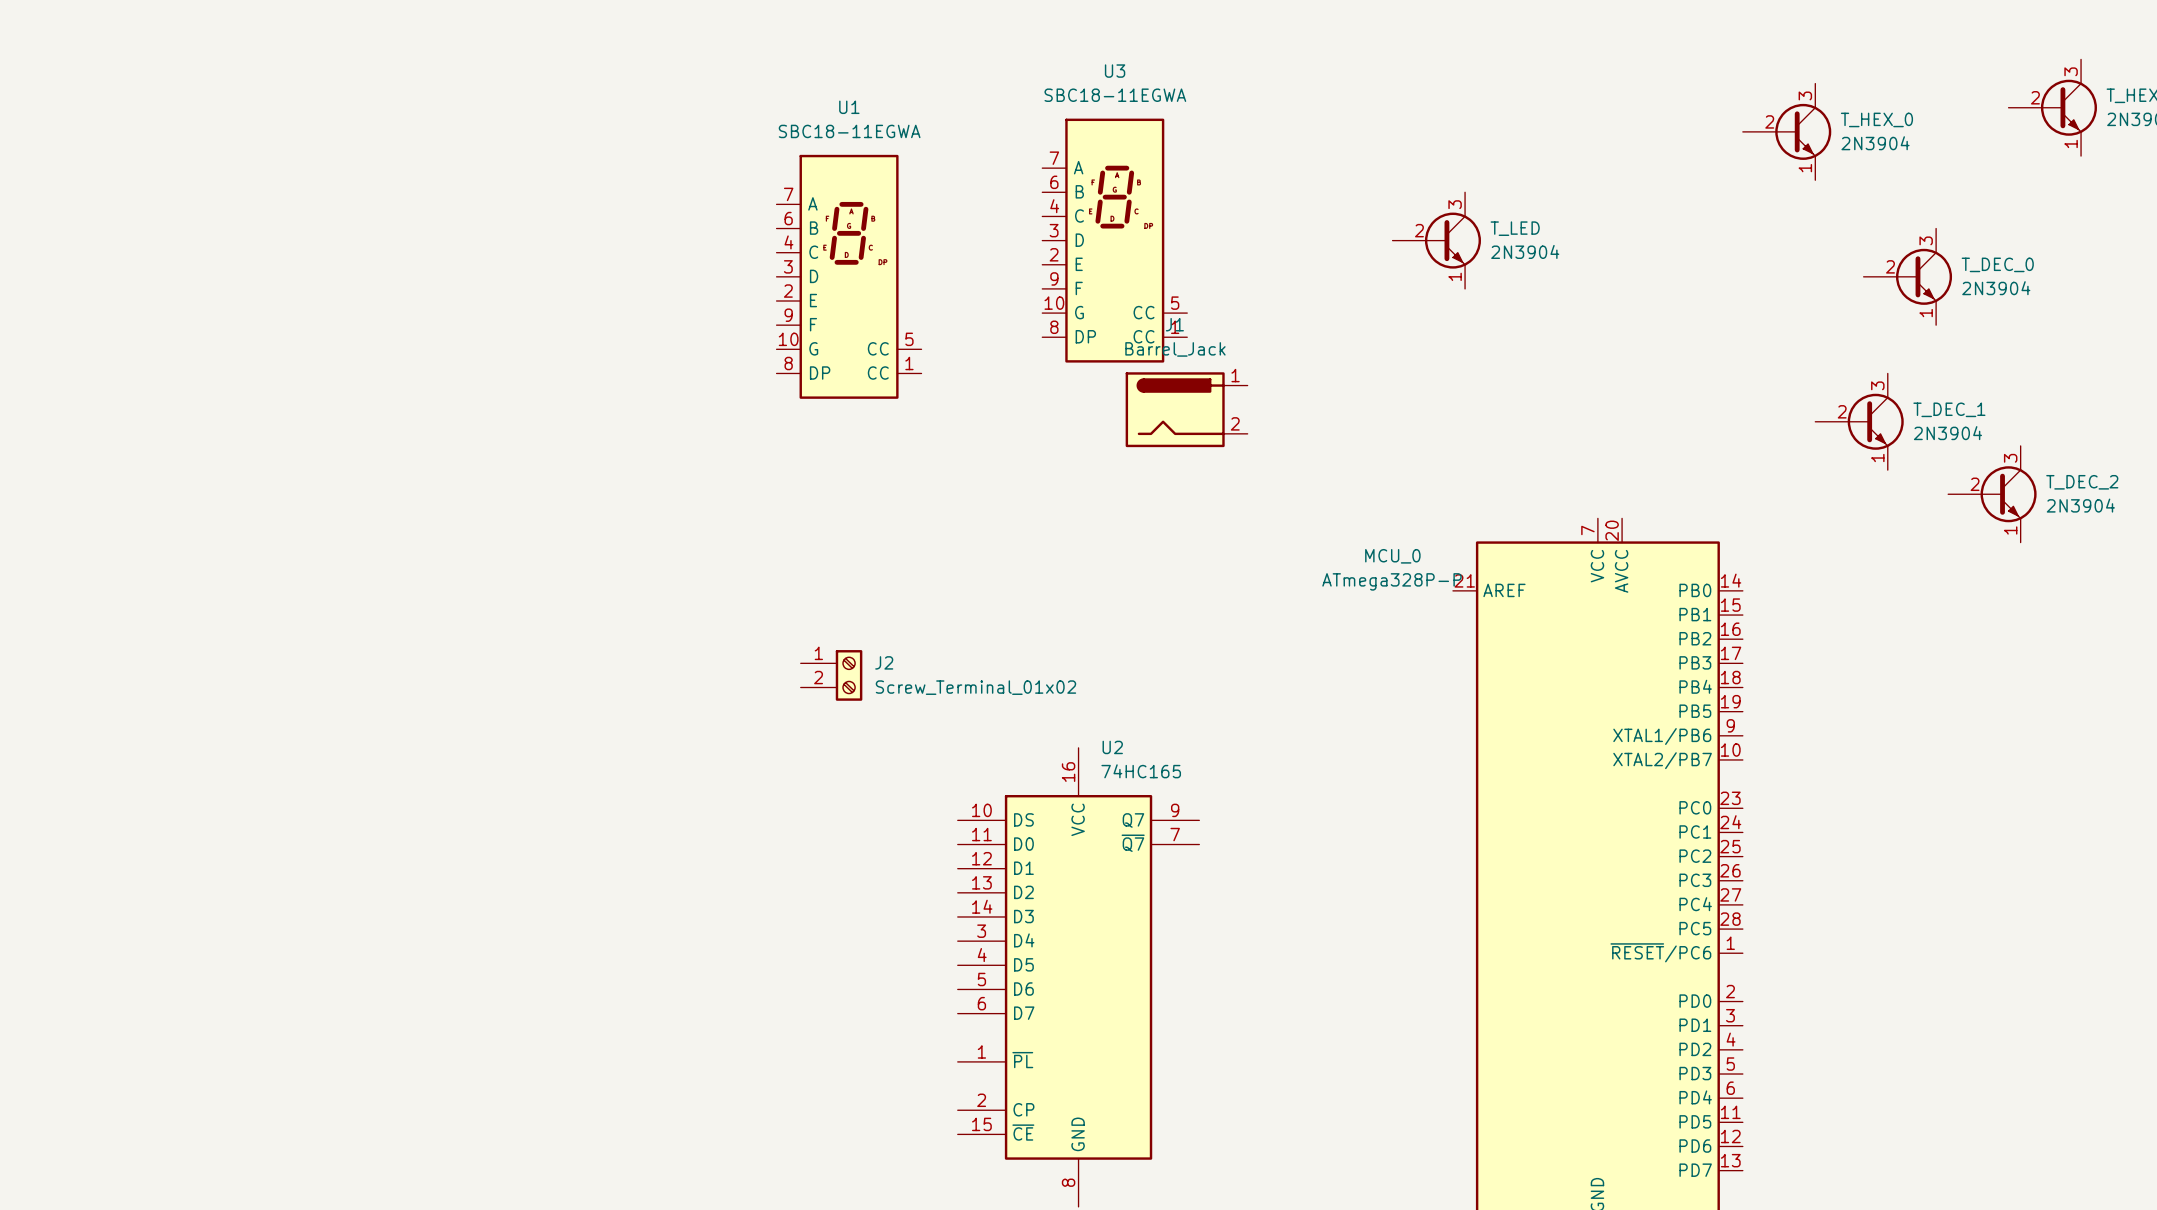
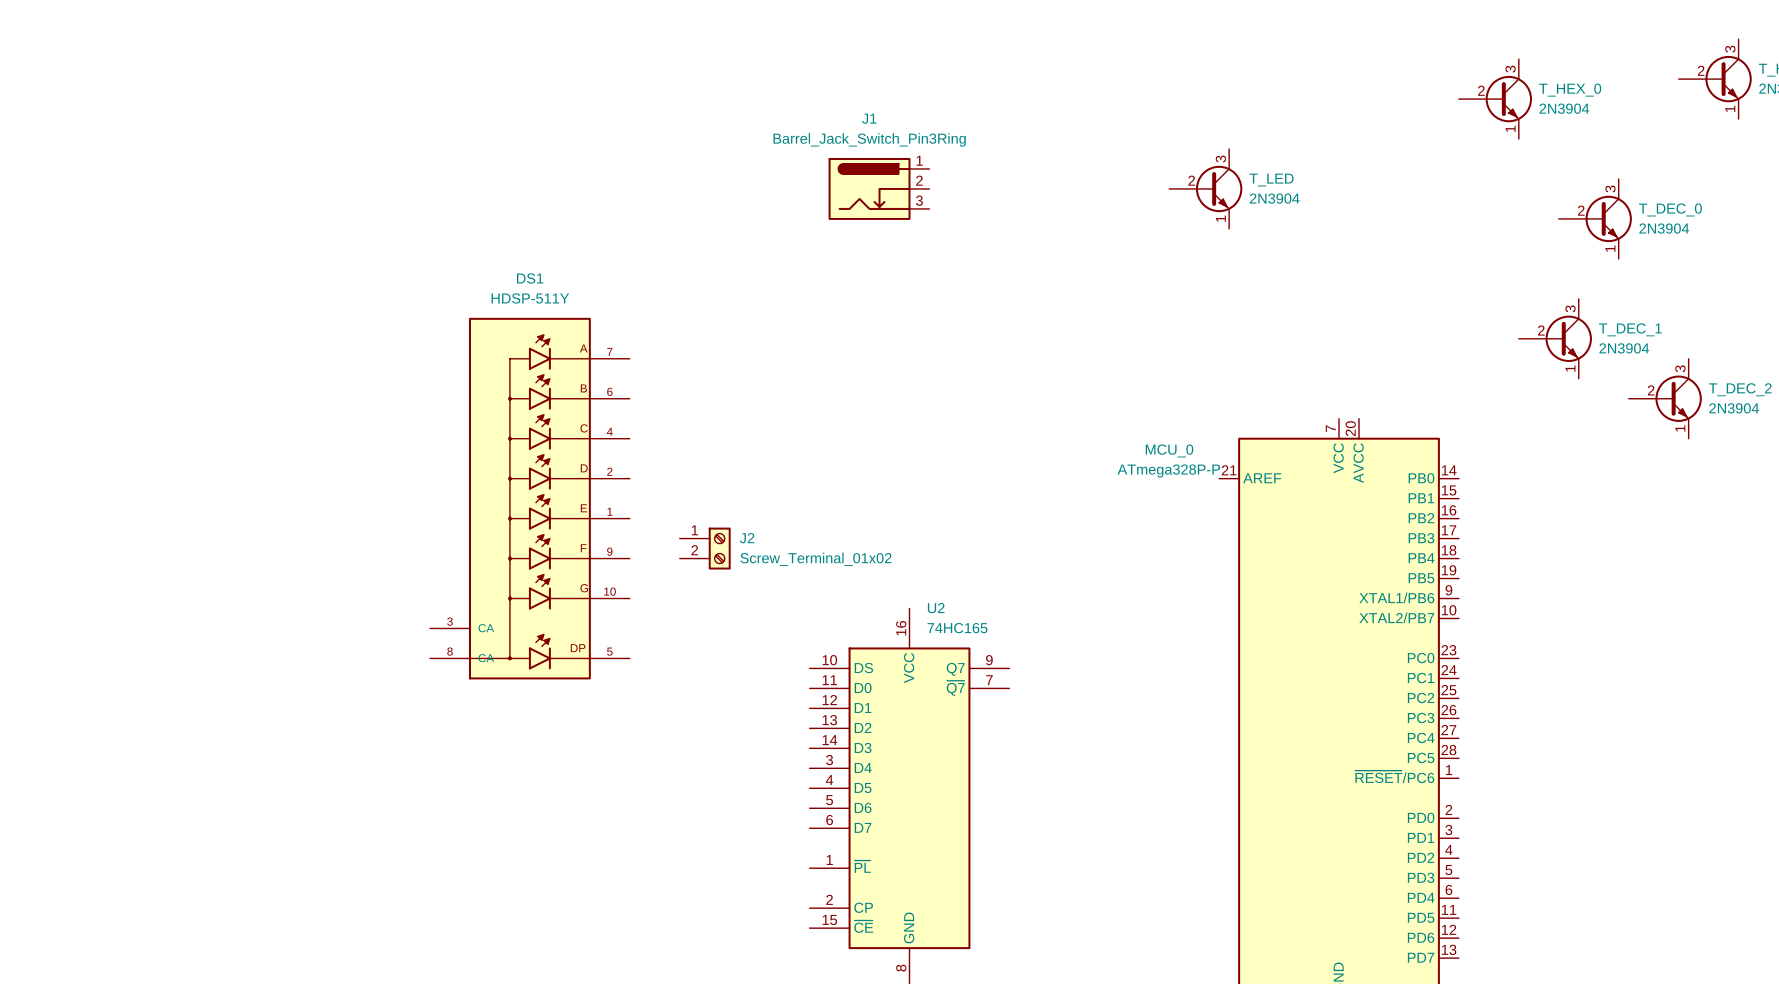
U3: SBC18-11EGWA (1114, 240) -> none
U1: SBC18-11EGWA (849, 276) -> none
J1 value: Barrel_Jack (1175, 349) -> Barrel_Jack_Switch_Pin3Ring (869, 139)
J1 symbol: [1125, 372, 1248, 448] -> [828, 158, 930, 220]
DS1: none -> HDSP-511Y (529, 498)

